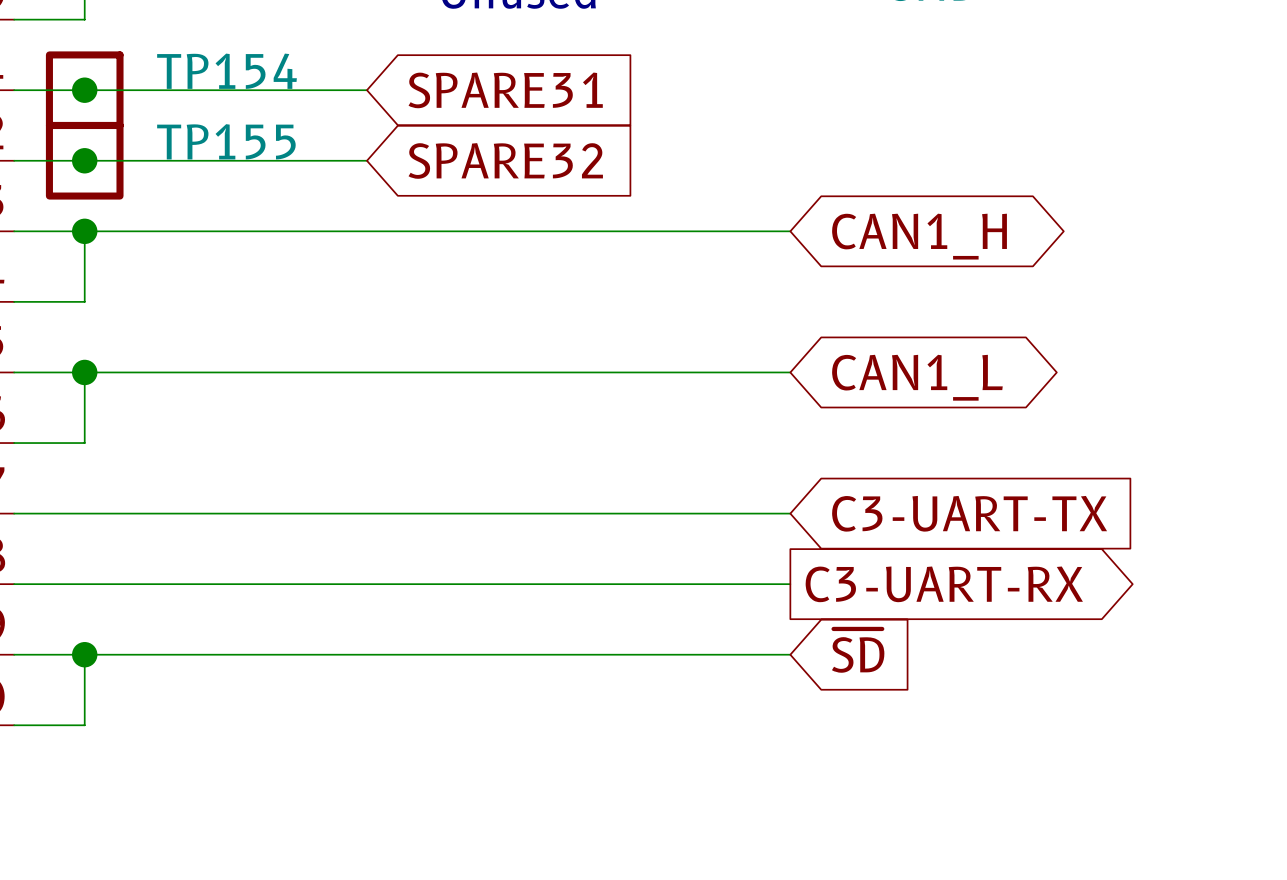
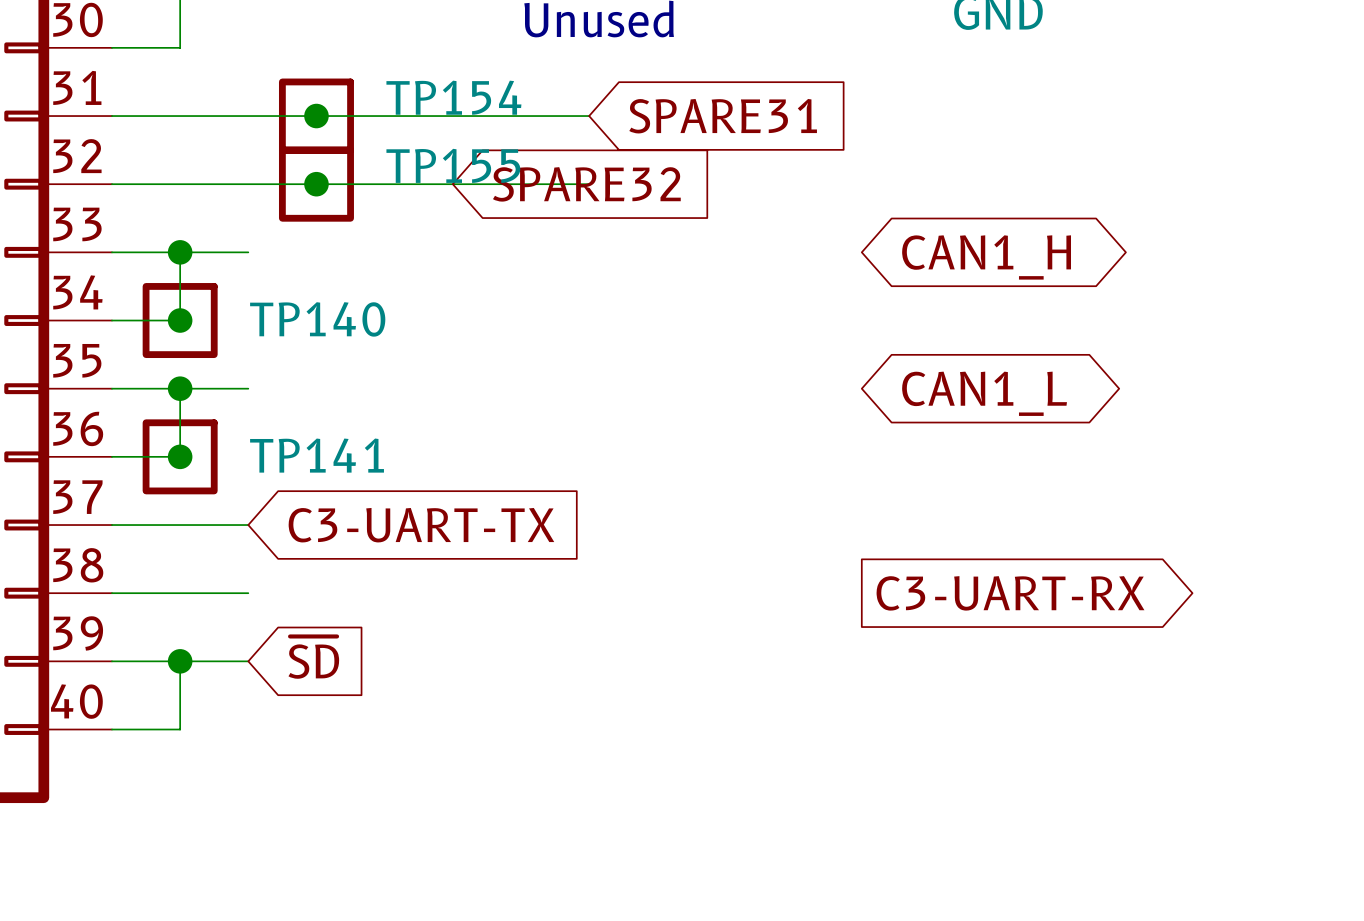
junction: (84, 90) -> none
TP154 position: (84, 90) -> (316, 116)
junction: none -> (316, 116)
wire: none -> (452, 116) (589, 116)
global label position: SPARE31 (505, 90) -> SPARE31 (723, 116)
junction: (84, 160) -> none
TP155 position: (84, 160) -> (316, 184)
junction: none -> (316, 184)
wire: none -> (452, 184) (589, 184)
wire: (155, 231) (790, 231) -> none
junction: none -> (180, 320)
TP140: none -> (180, 320)
wire: (155, 372) (790, 372) -> none
junction: none -> (180, 456)
TP141: none -> (180, 456)
wire: (155, 513) (790, 513) -> none
global label position: C3-UART-TX (969, 513) -> C3-UART-TX (421, 525)
wire: (155, 584) (790, 584) -> none
global label position: ~{SD} (858, 650) -> ~{SD} (313, 657)
wire: (155, 654) (790, 654) -> none

